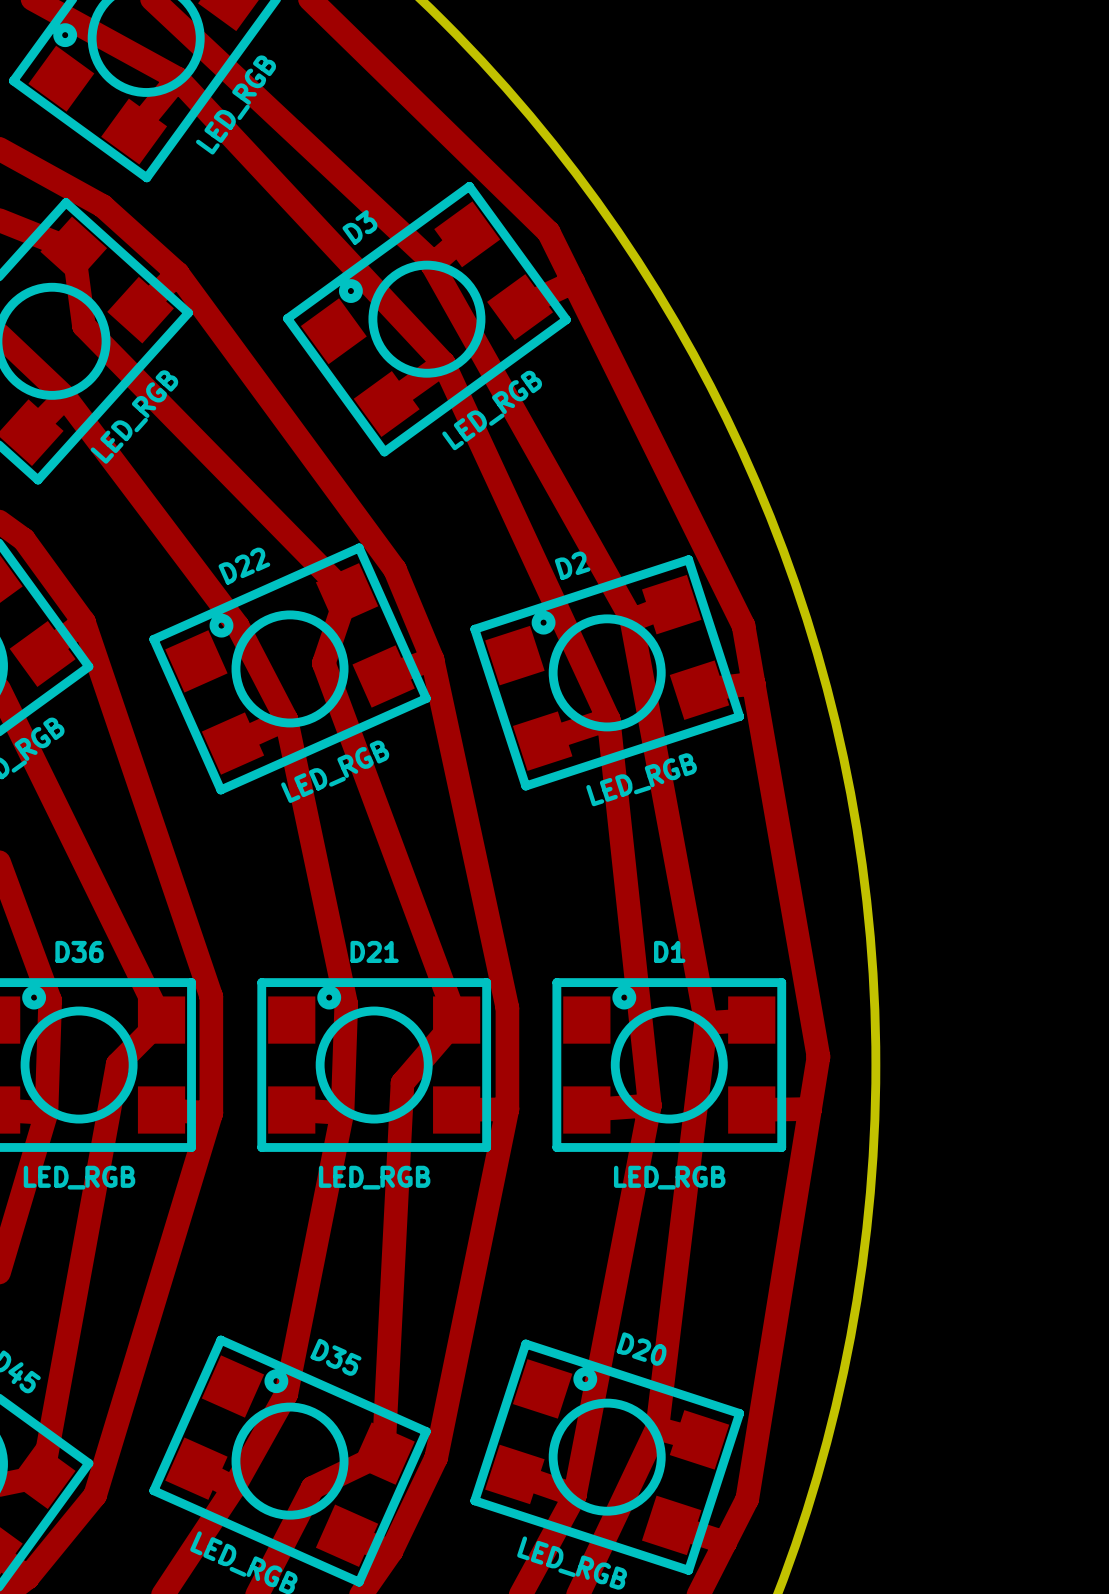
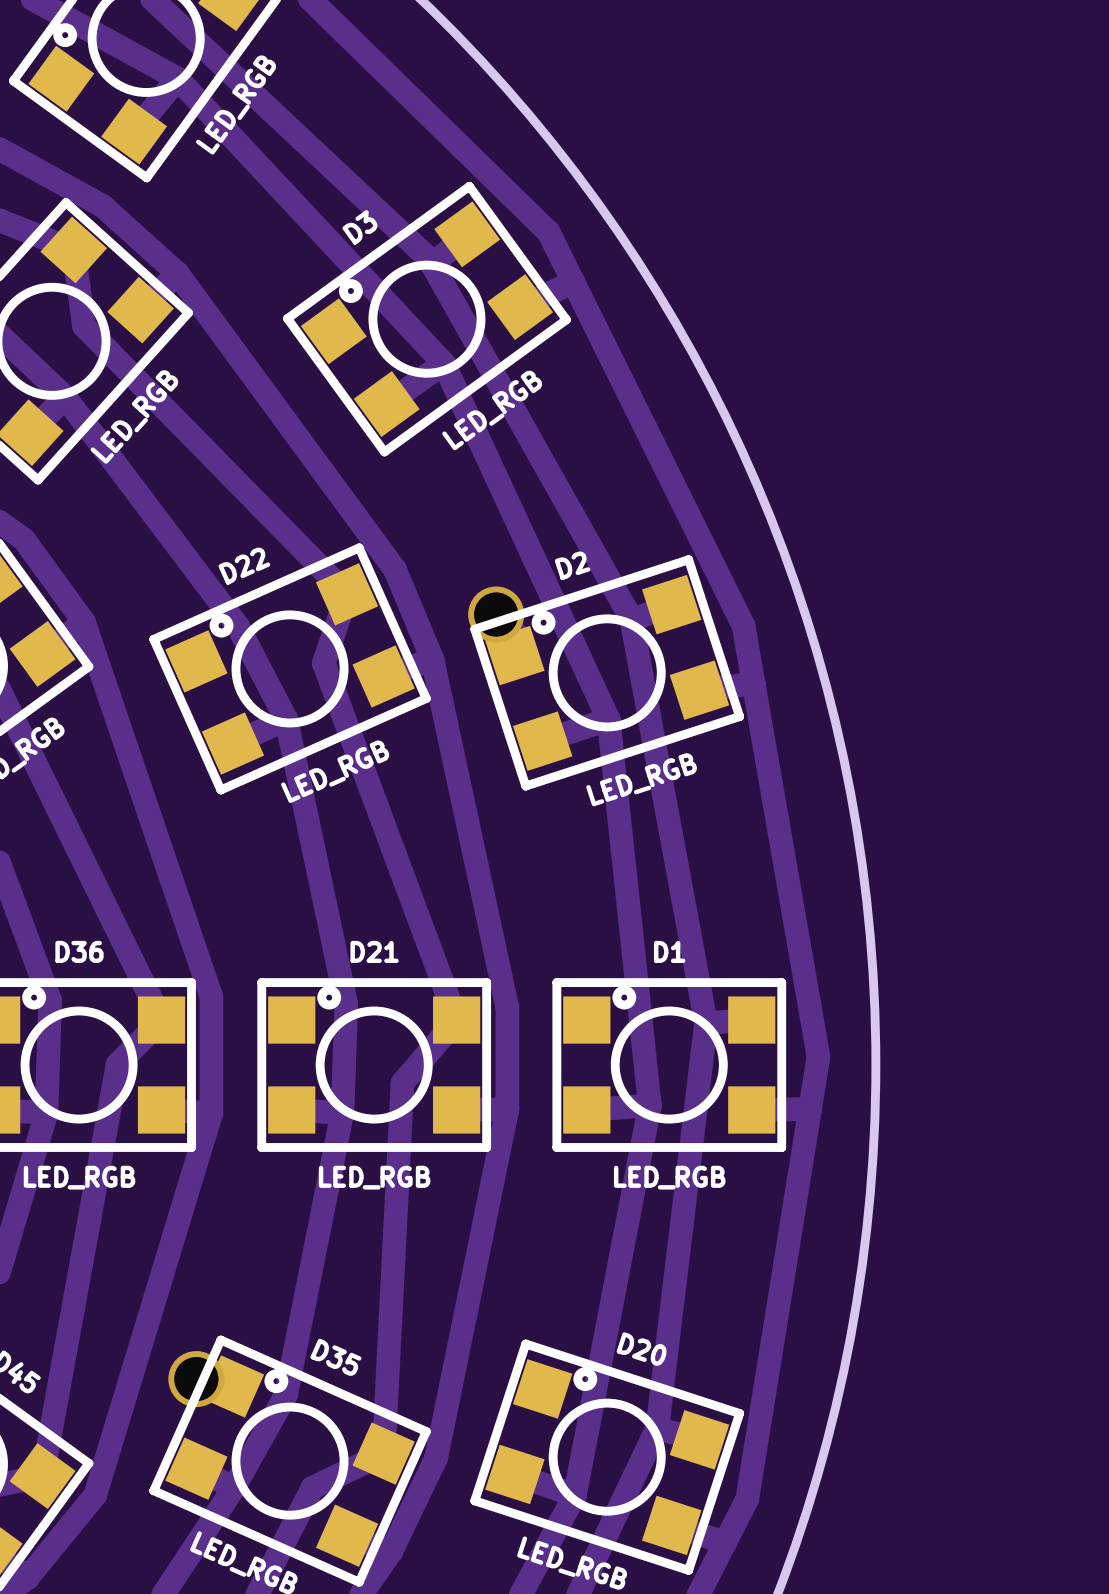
via: none -> (496, 614)
via: none -> (196, 1379)

